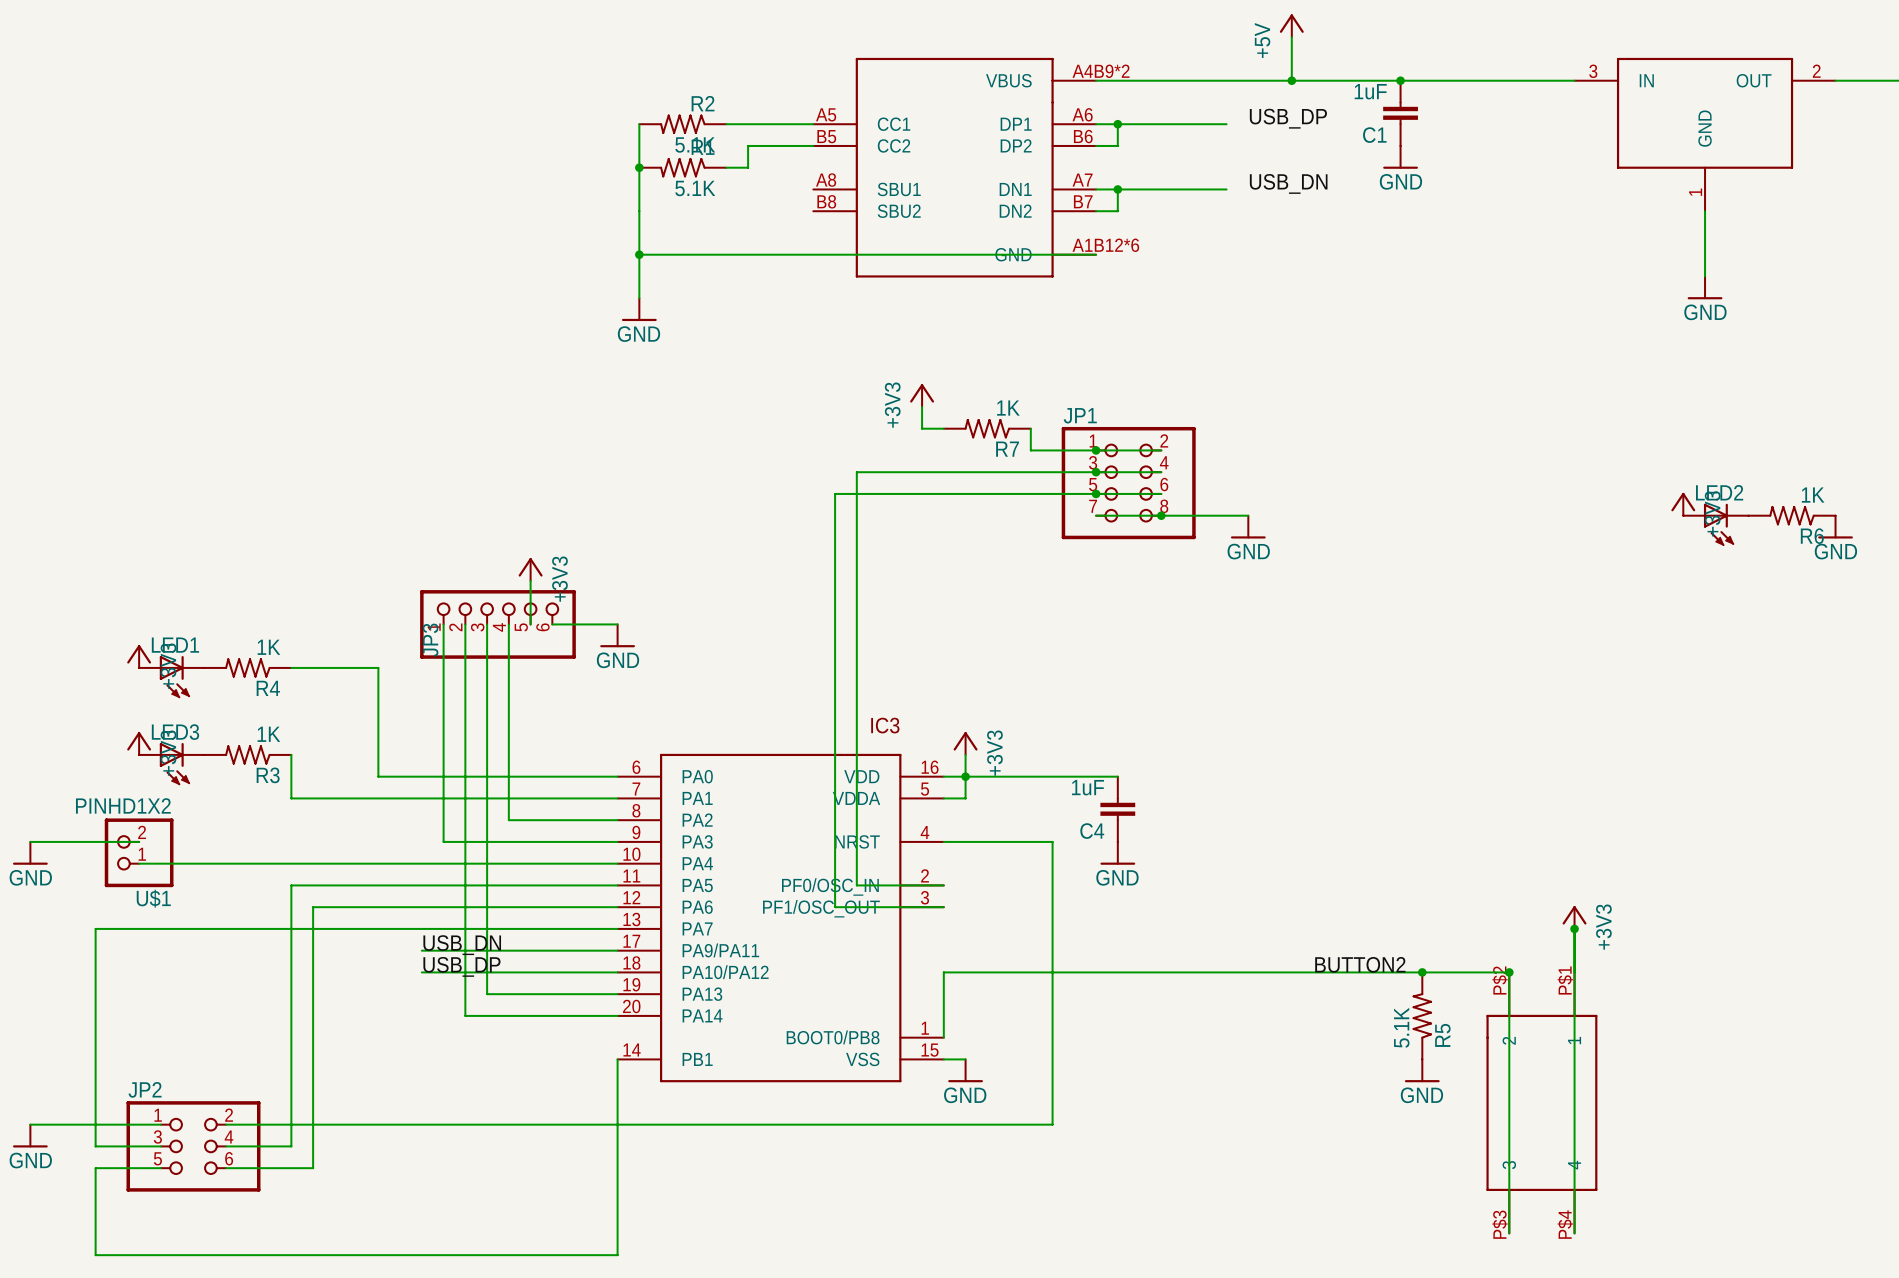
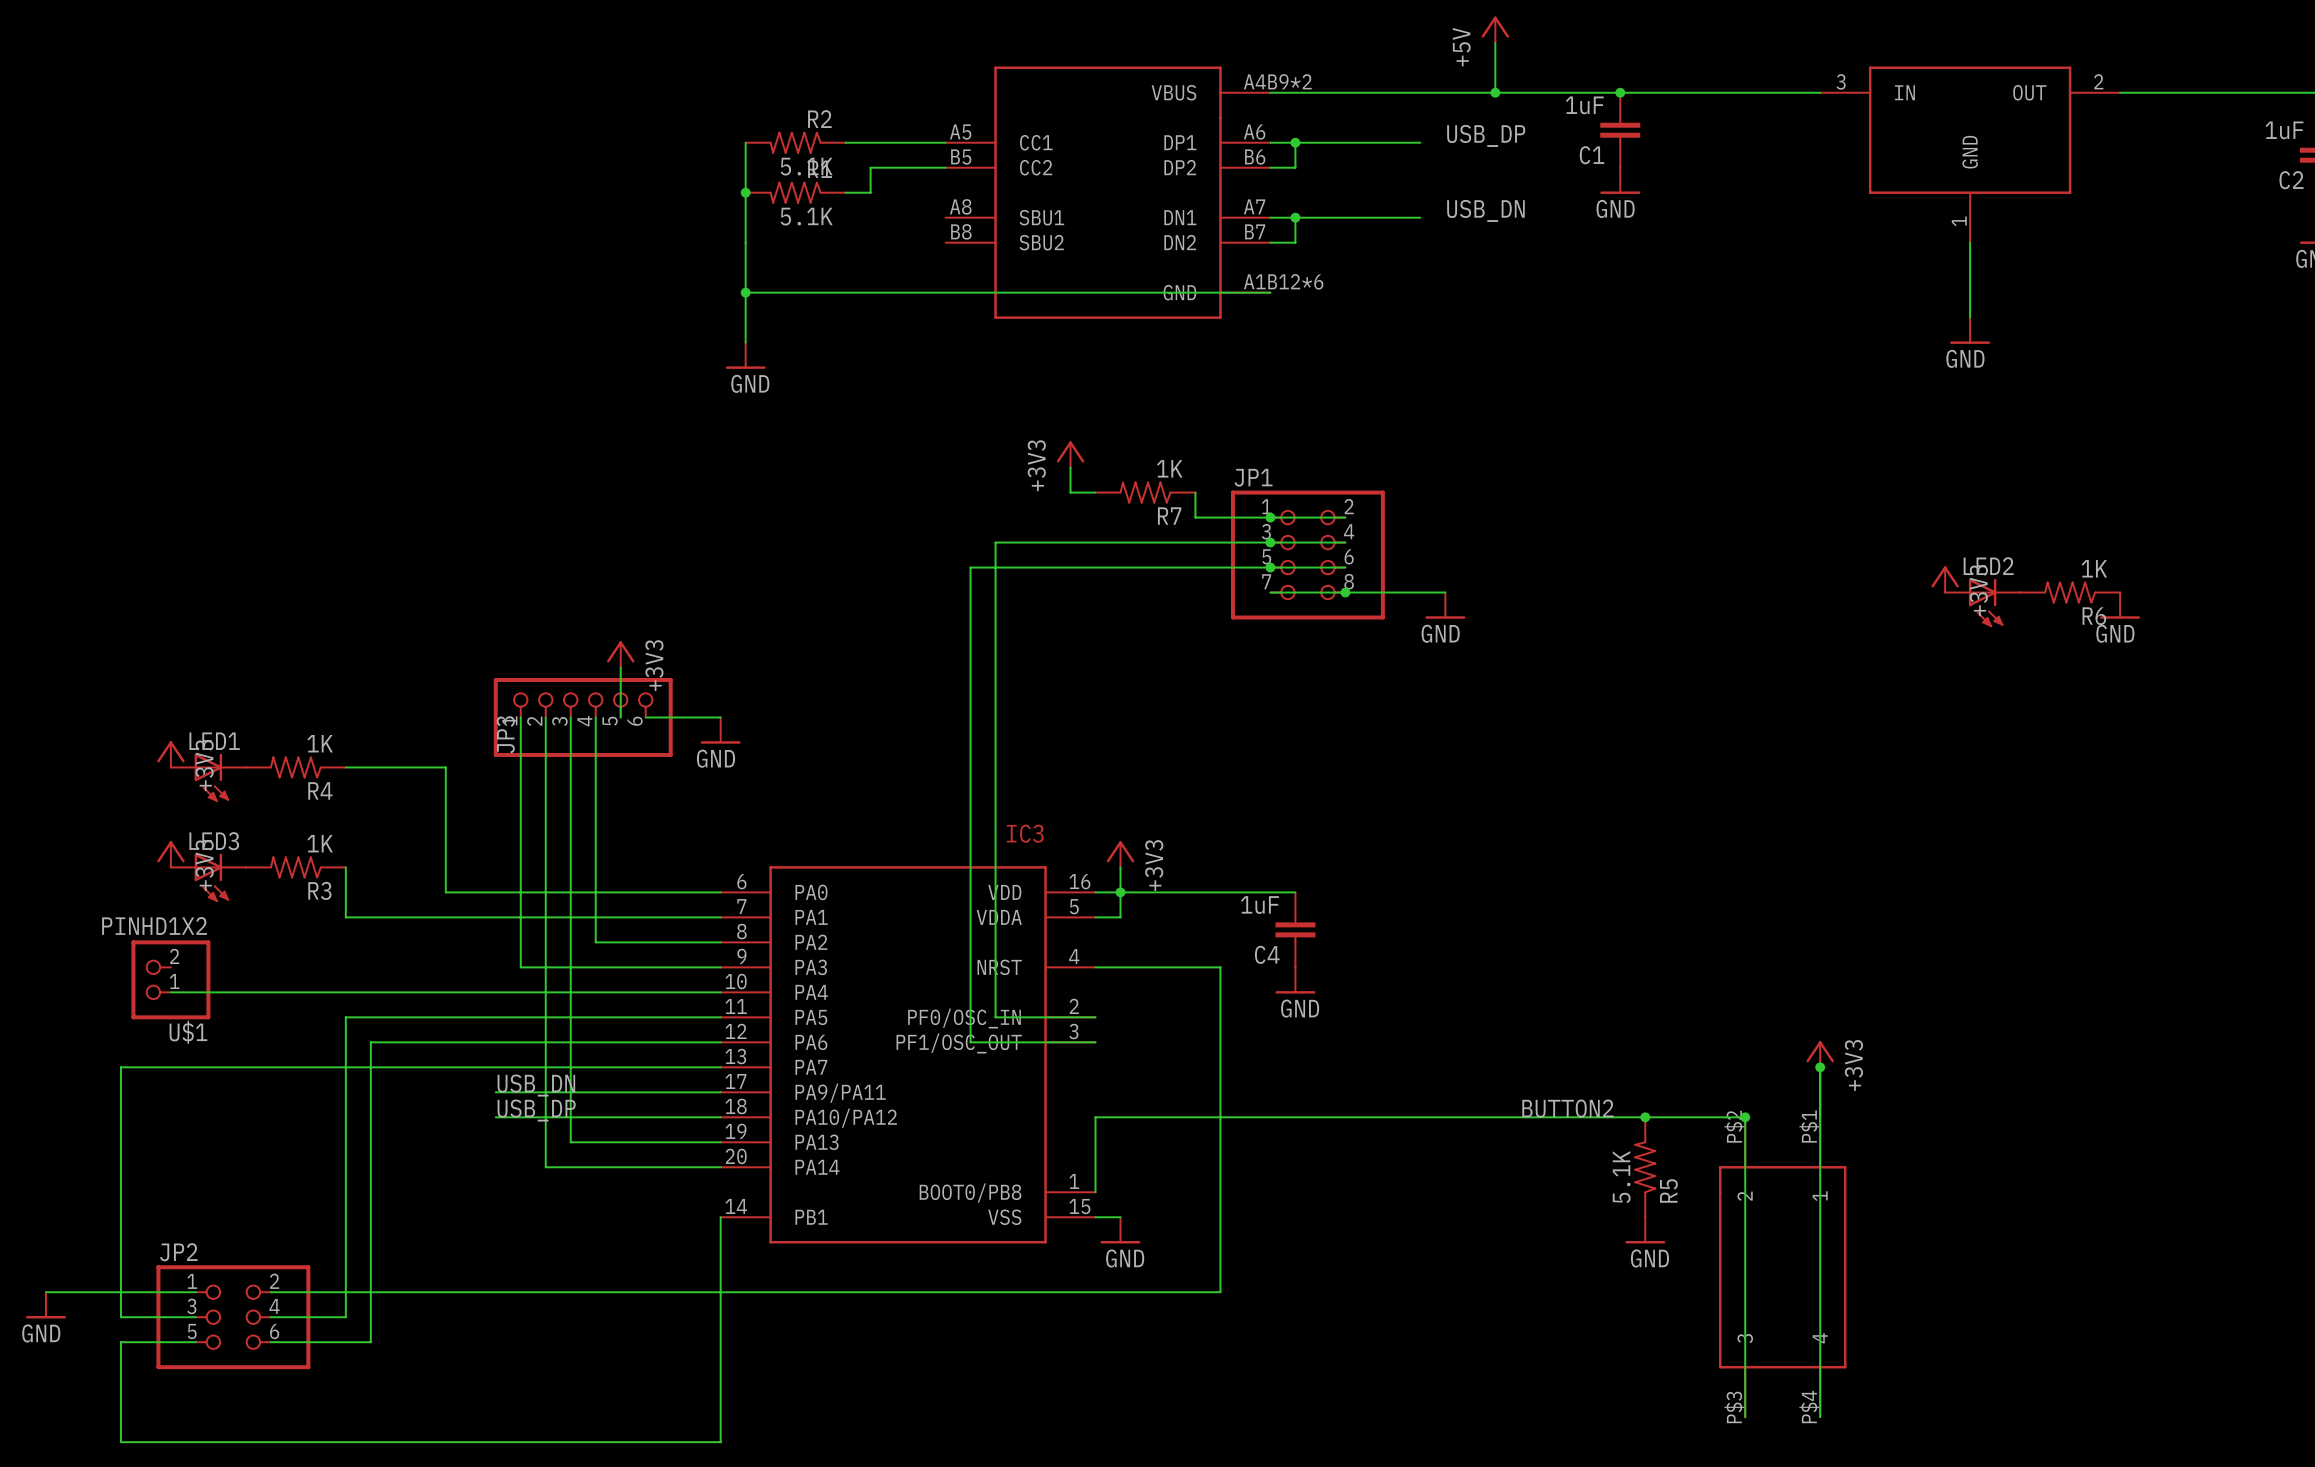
wire: (30, 841) (139, 841) -> none
power symbol: GND (30, 853) -> none

